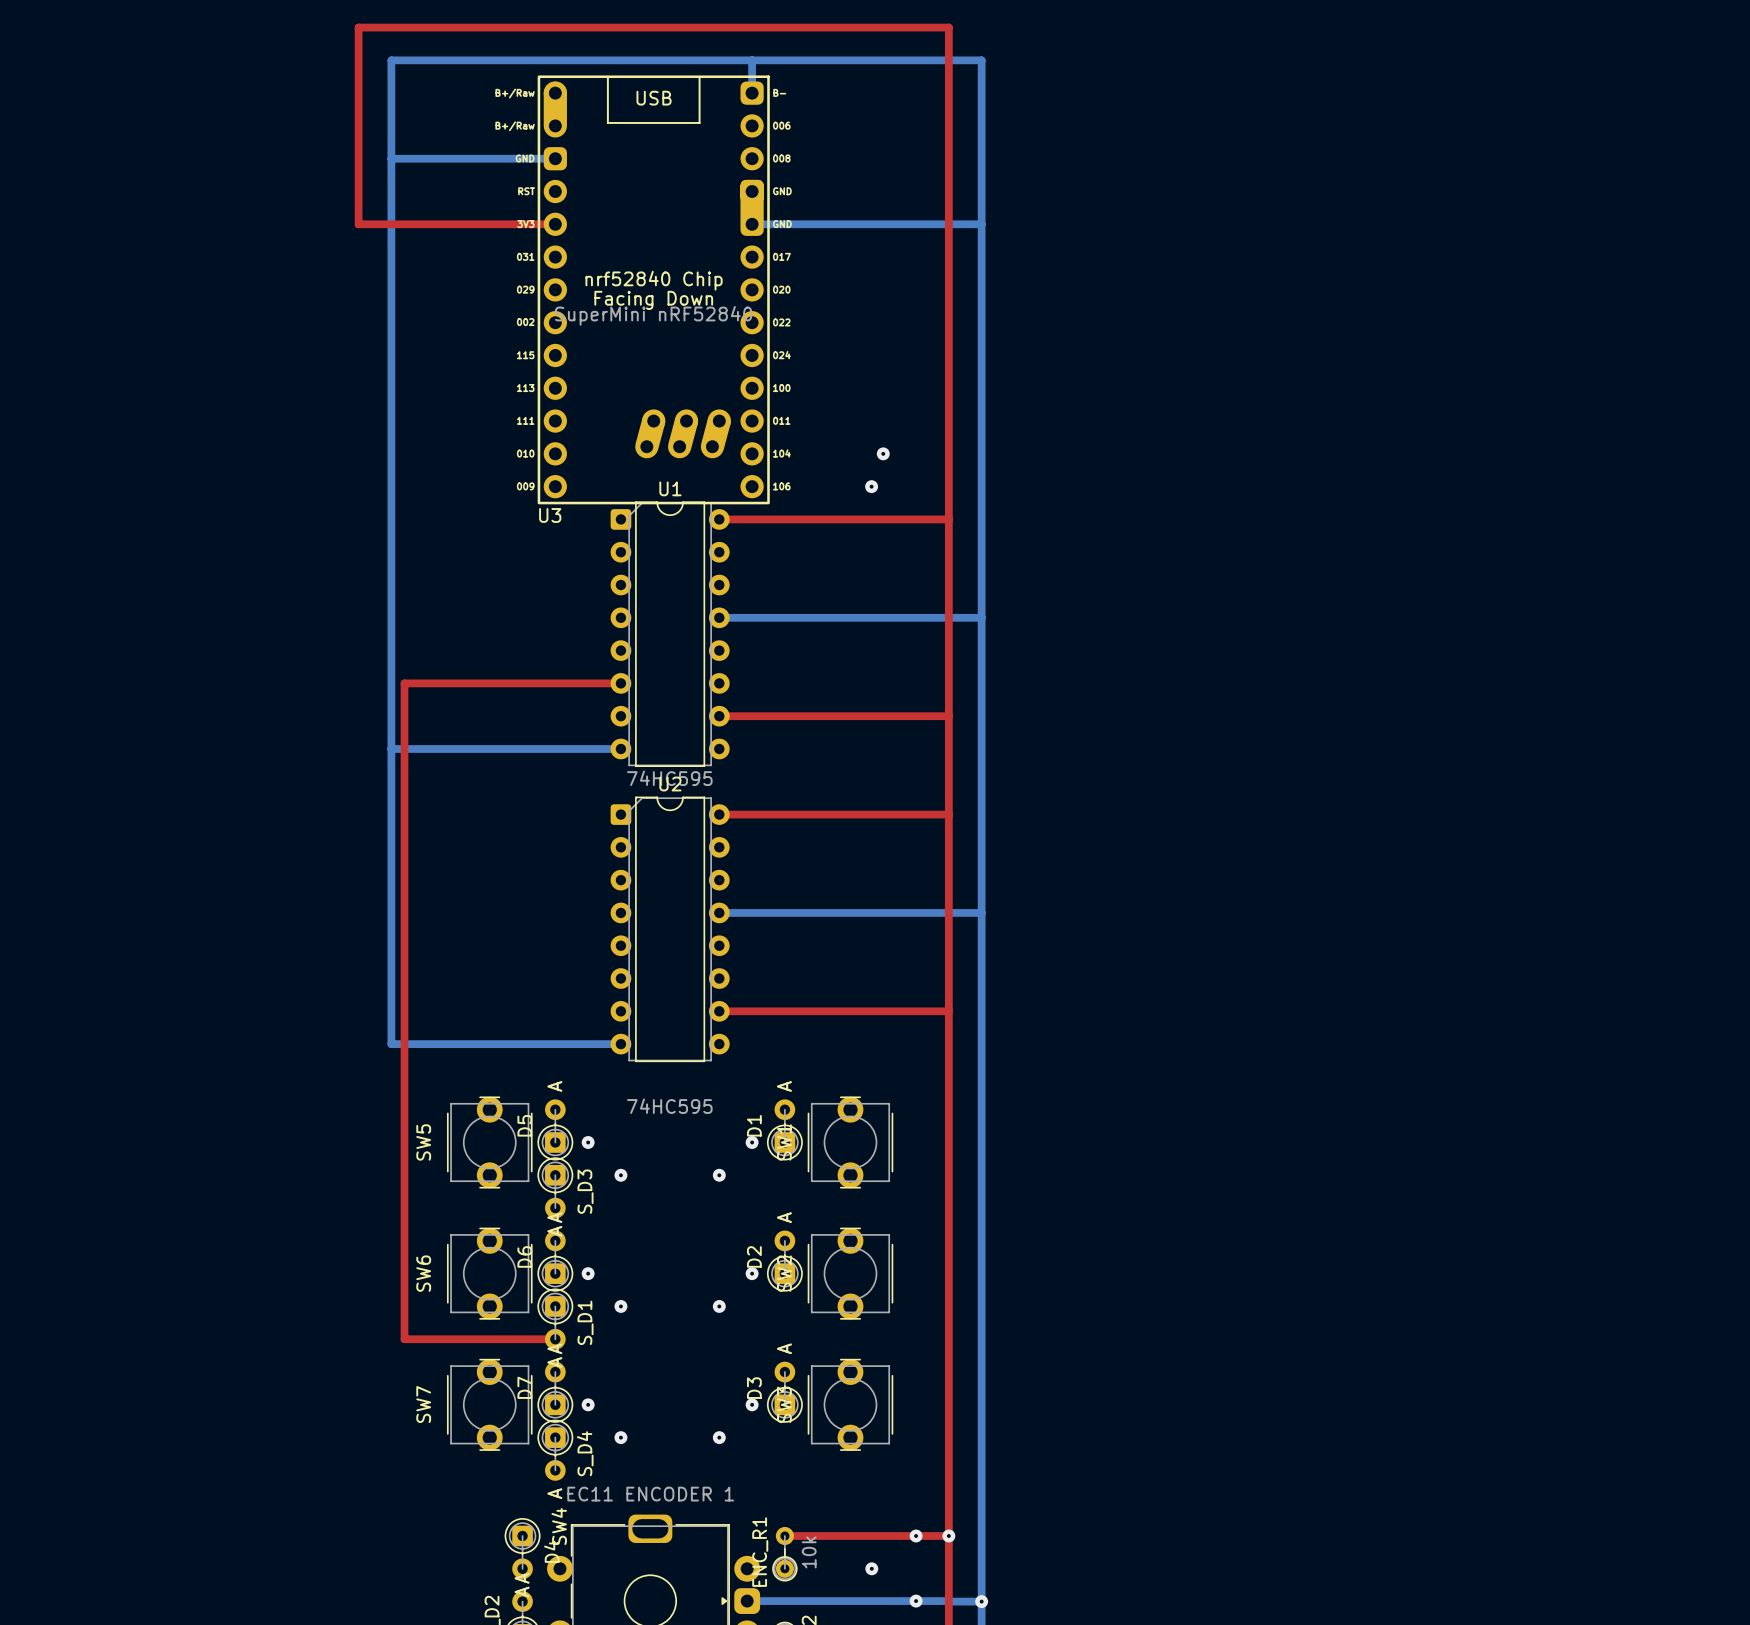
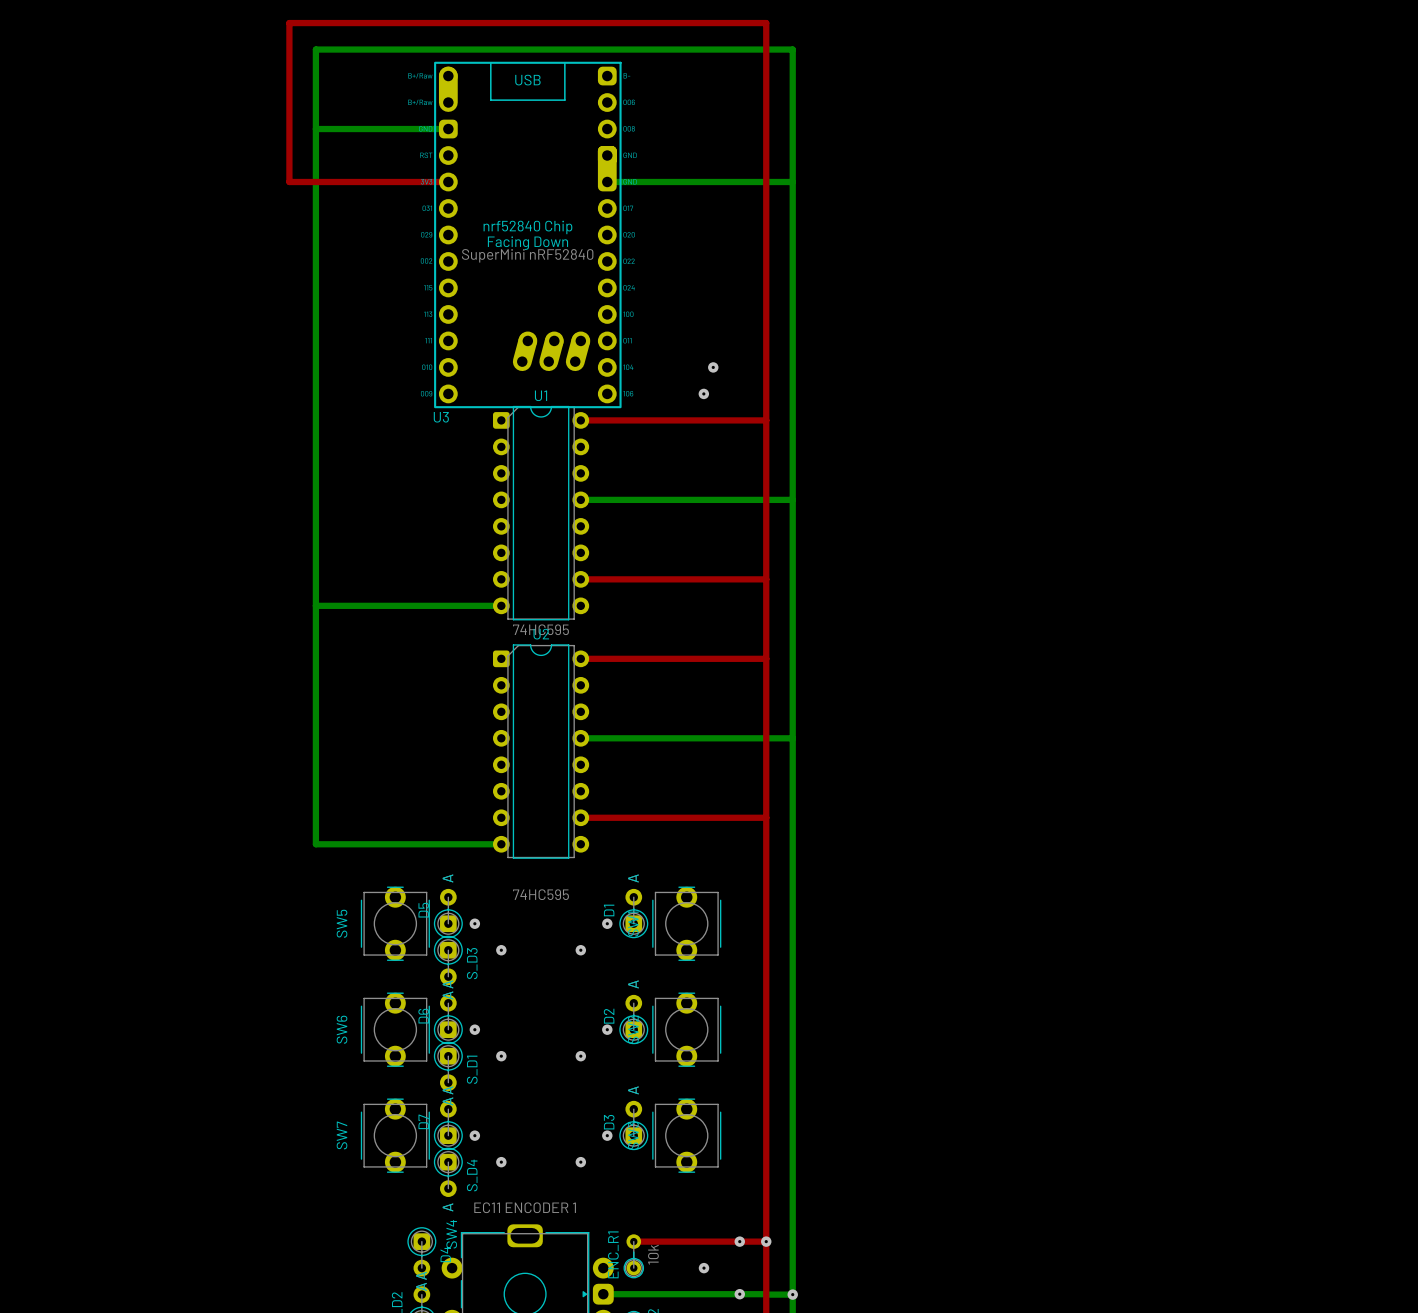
bottom track: (752, 60) (752, 93) -> none
top track: (620, 683) (404, 683) (404, 1339) (555, 1339) -> none

